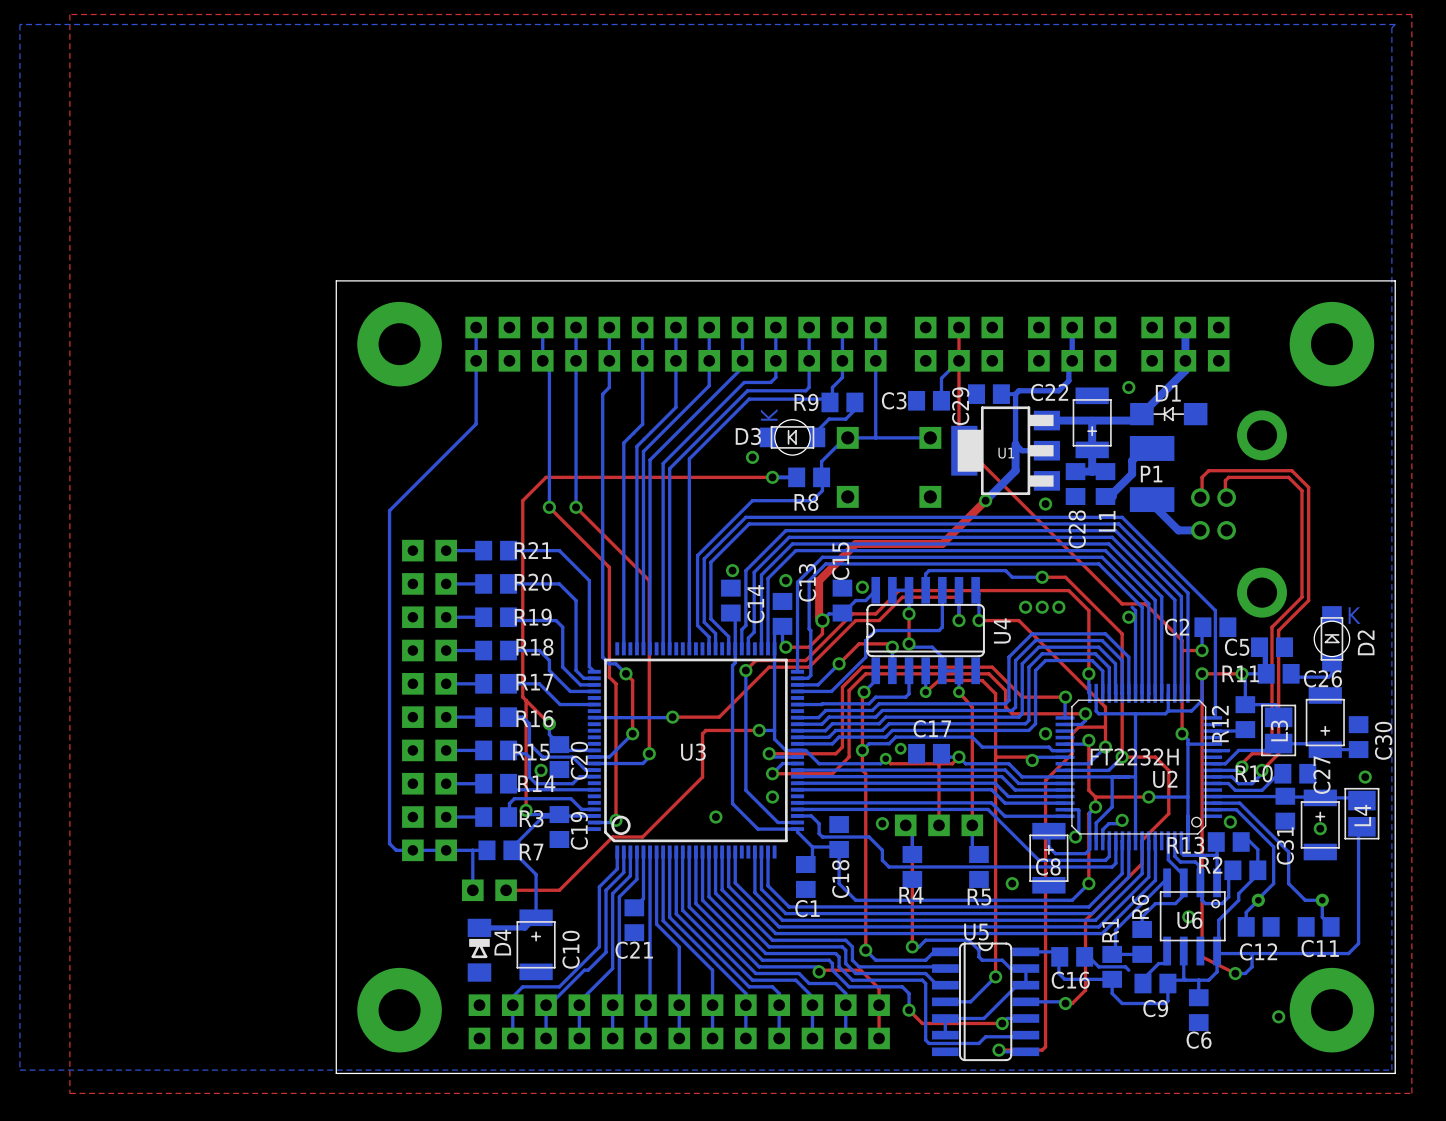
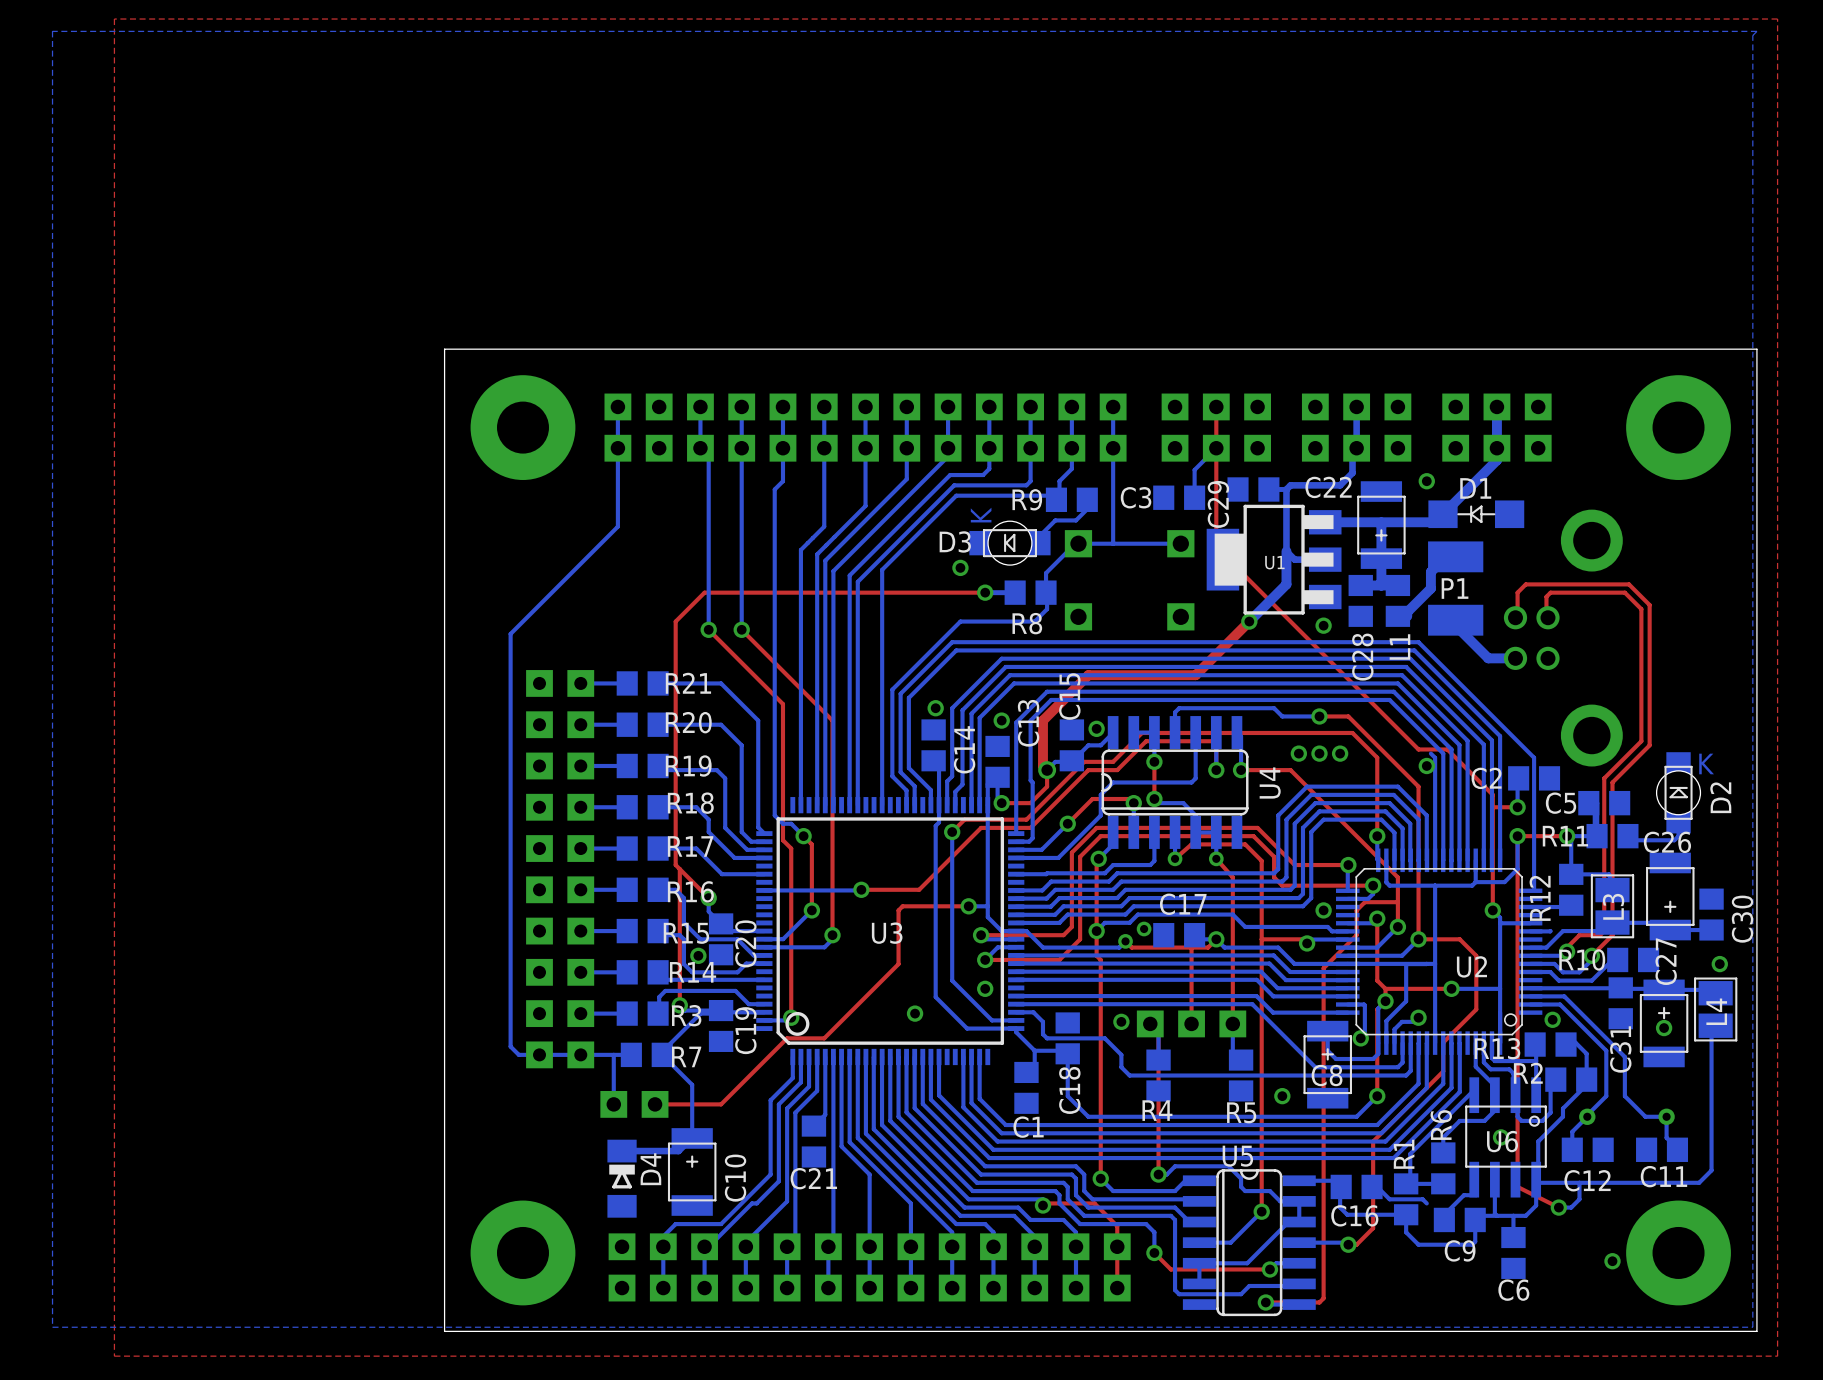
U2 value: FT2232H (1134, 757) -> none

